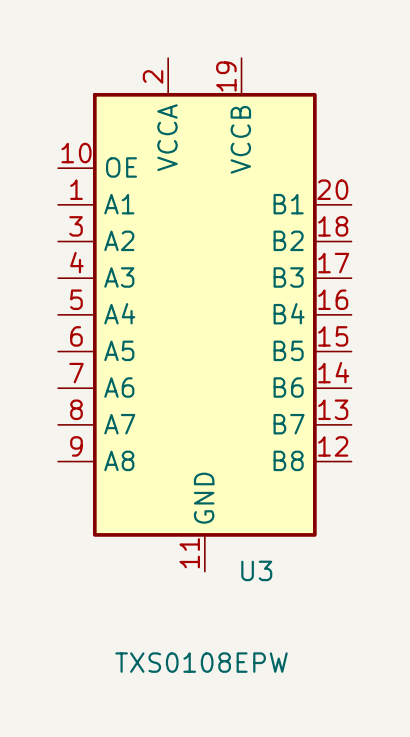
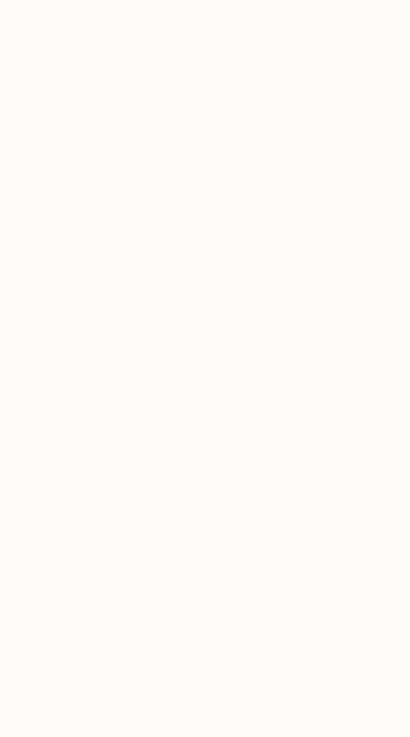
U3: TXS0108EPW (204, 314) -> none

